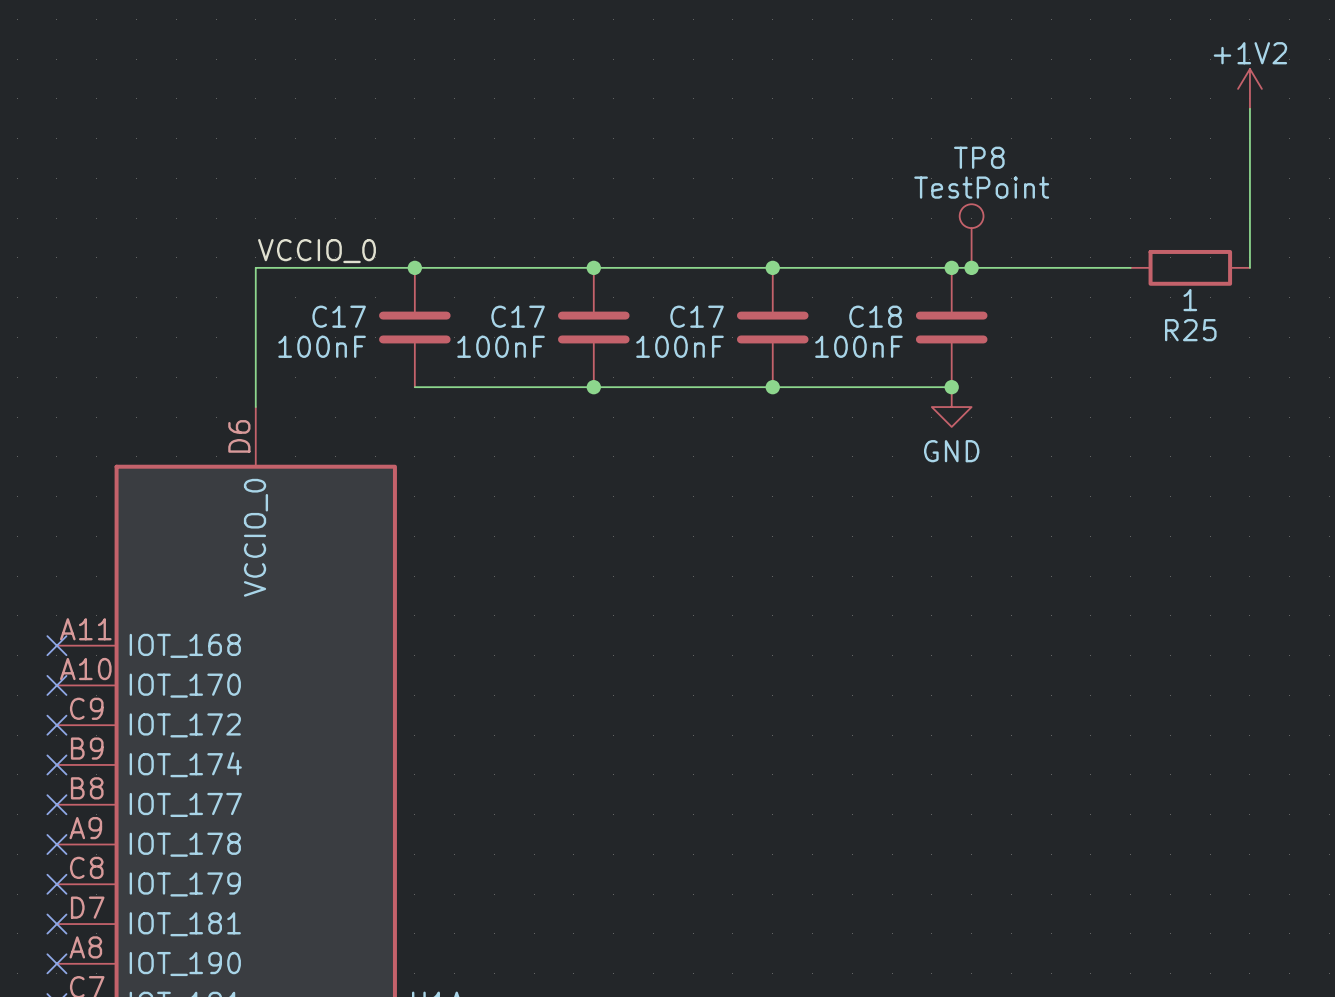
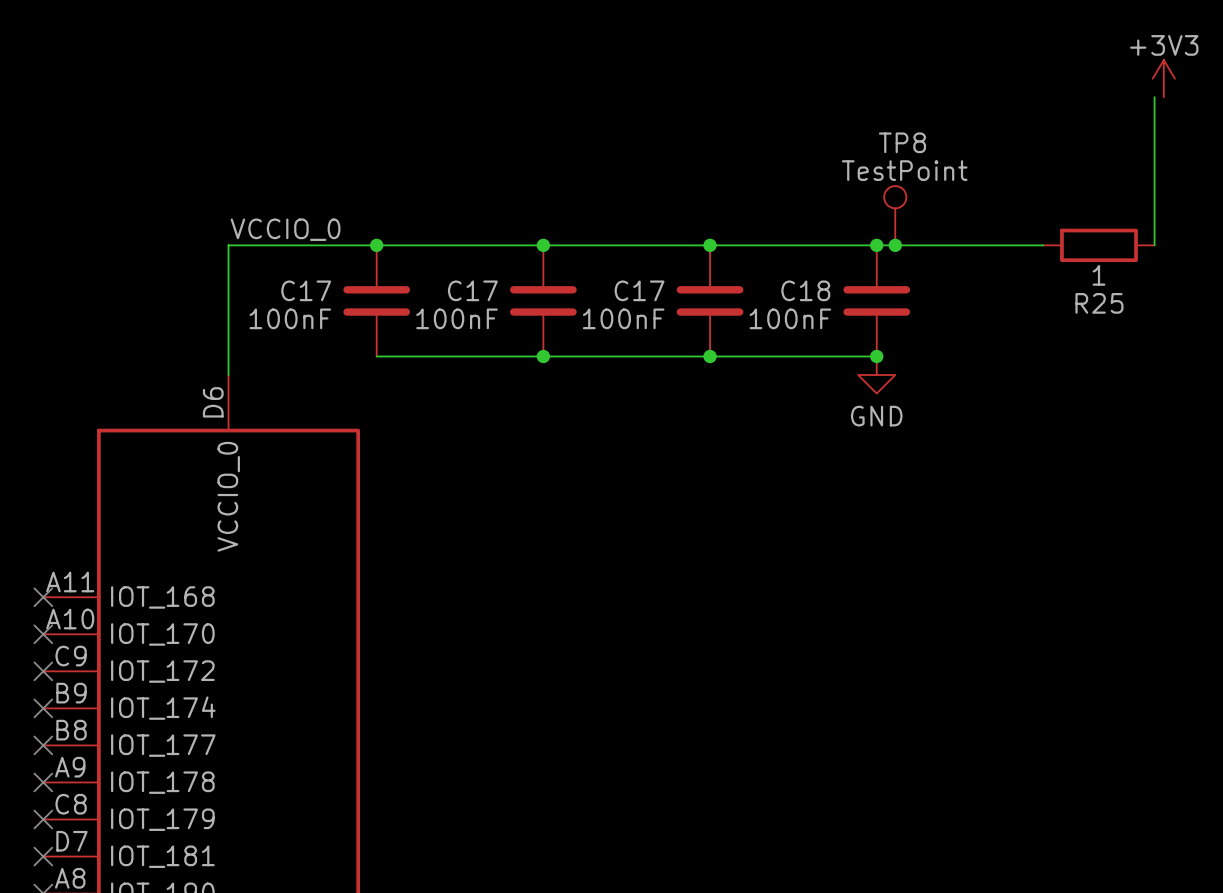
power symbol: +1V2 (1249, 88) -> +3V3 (1163, 78)

